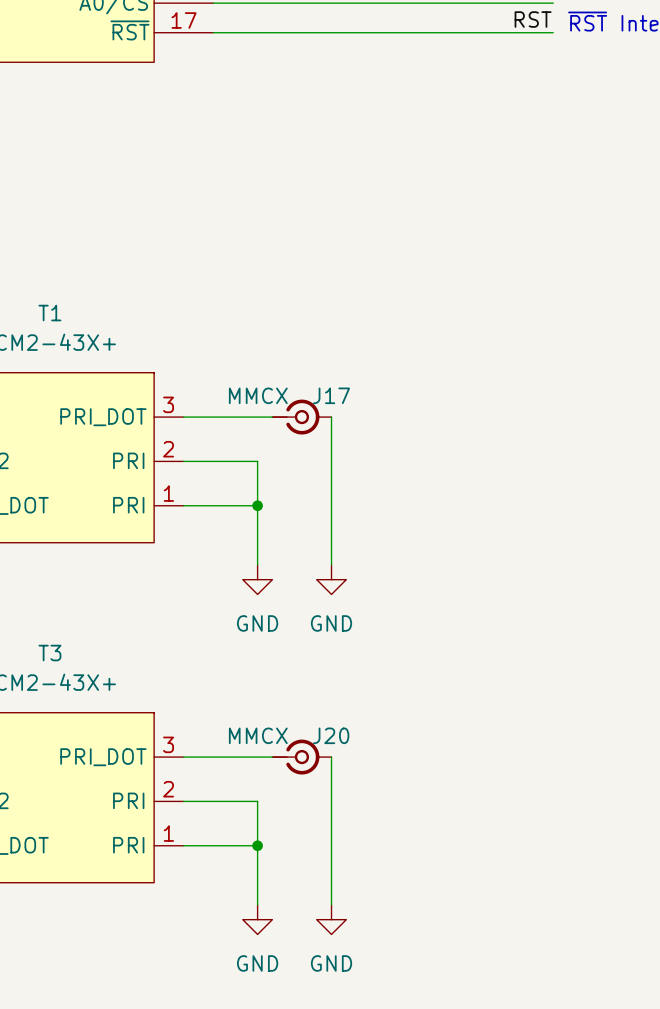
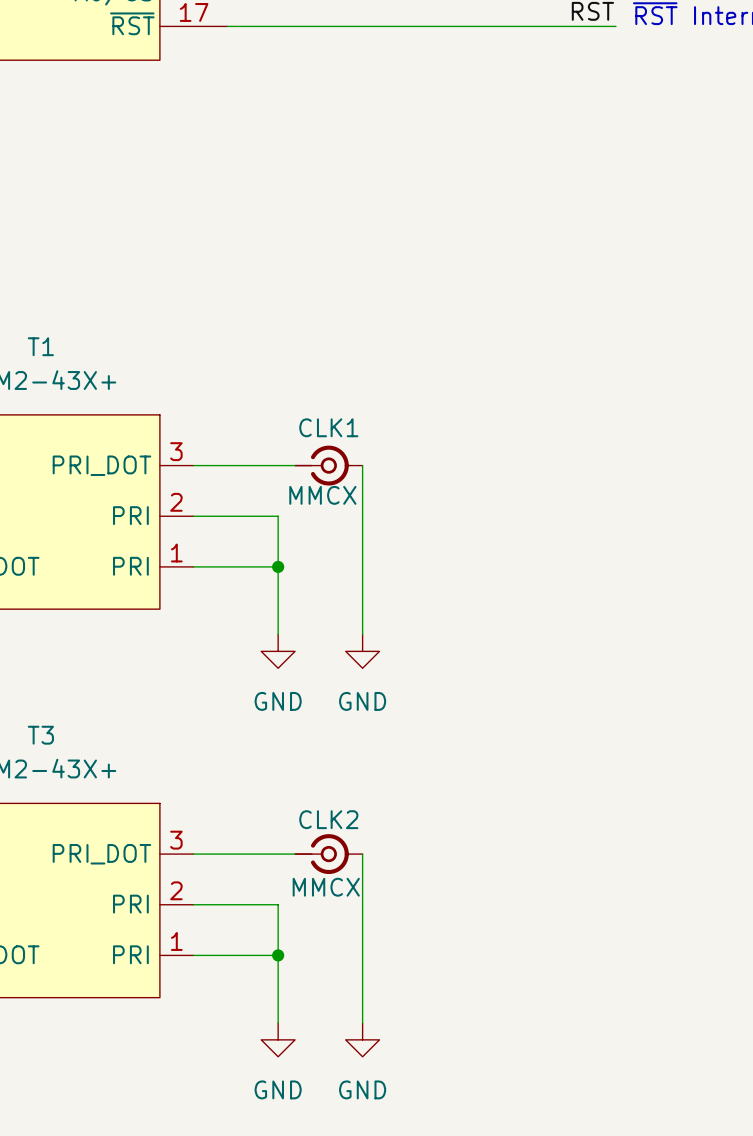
J17 value position: MMCX (258, 395) -> MMCX (322, 495)
J17 name: J17 (331, 395) -> CLK1 (328, 427)
J20 value position: MMCX (258, 735) -> MMCX (326, 887)
J20 name: J20 (331, 735) -> CLK2 (328, 819)

